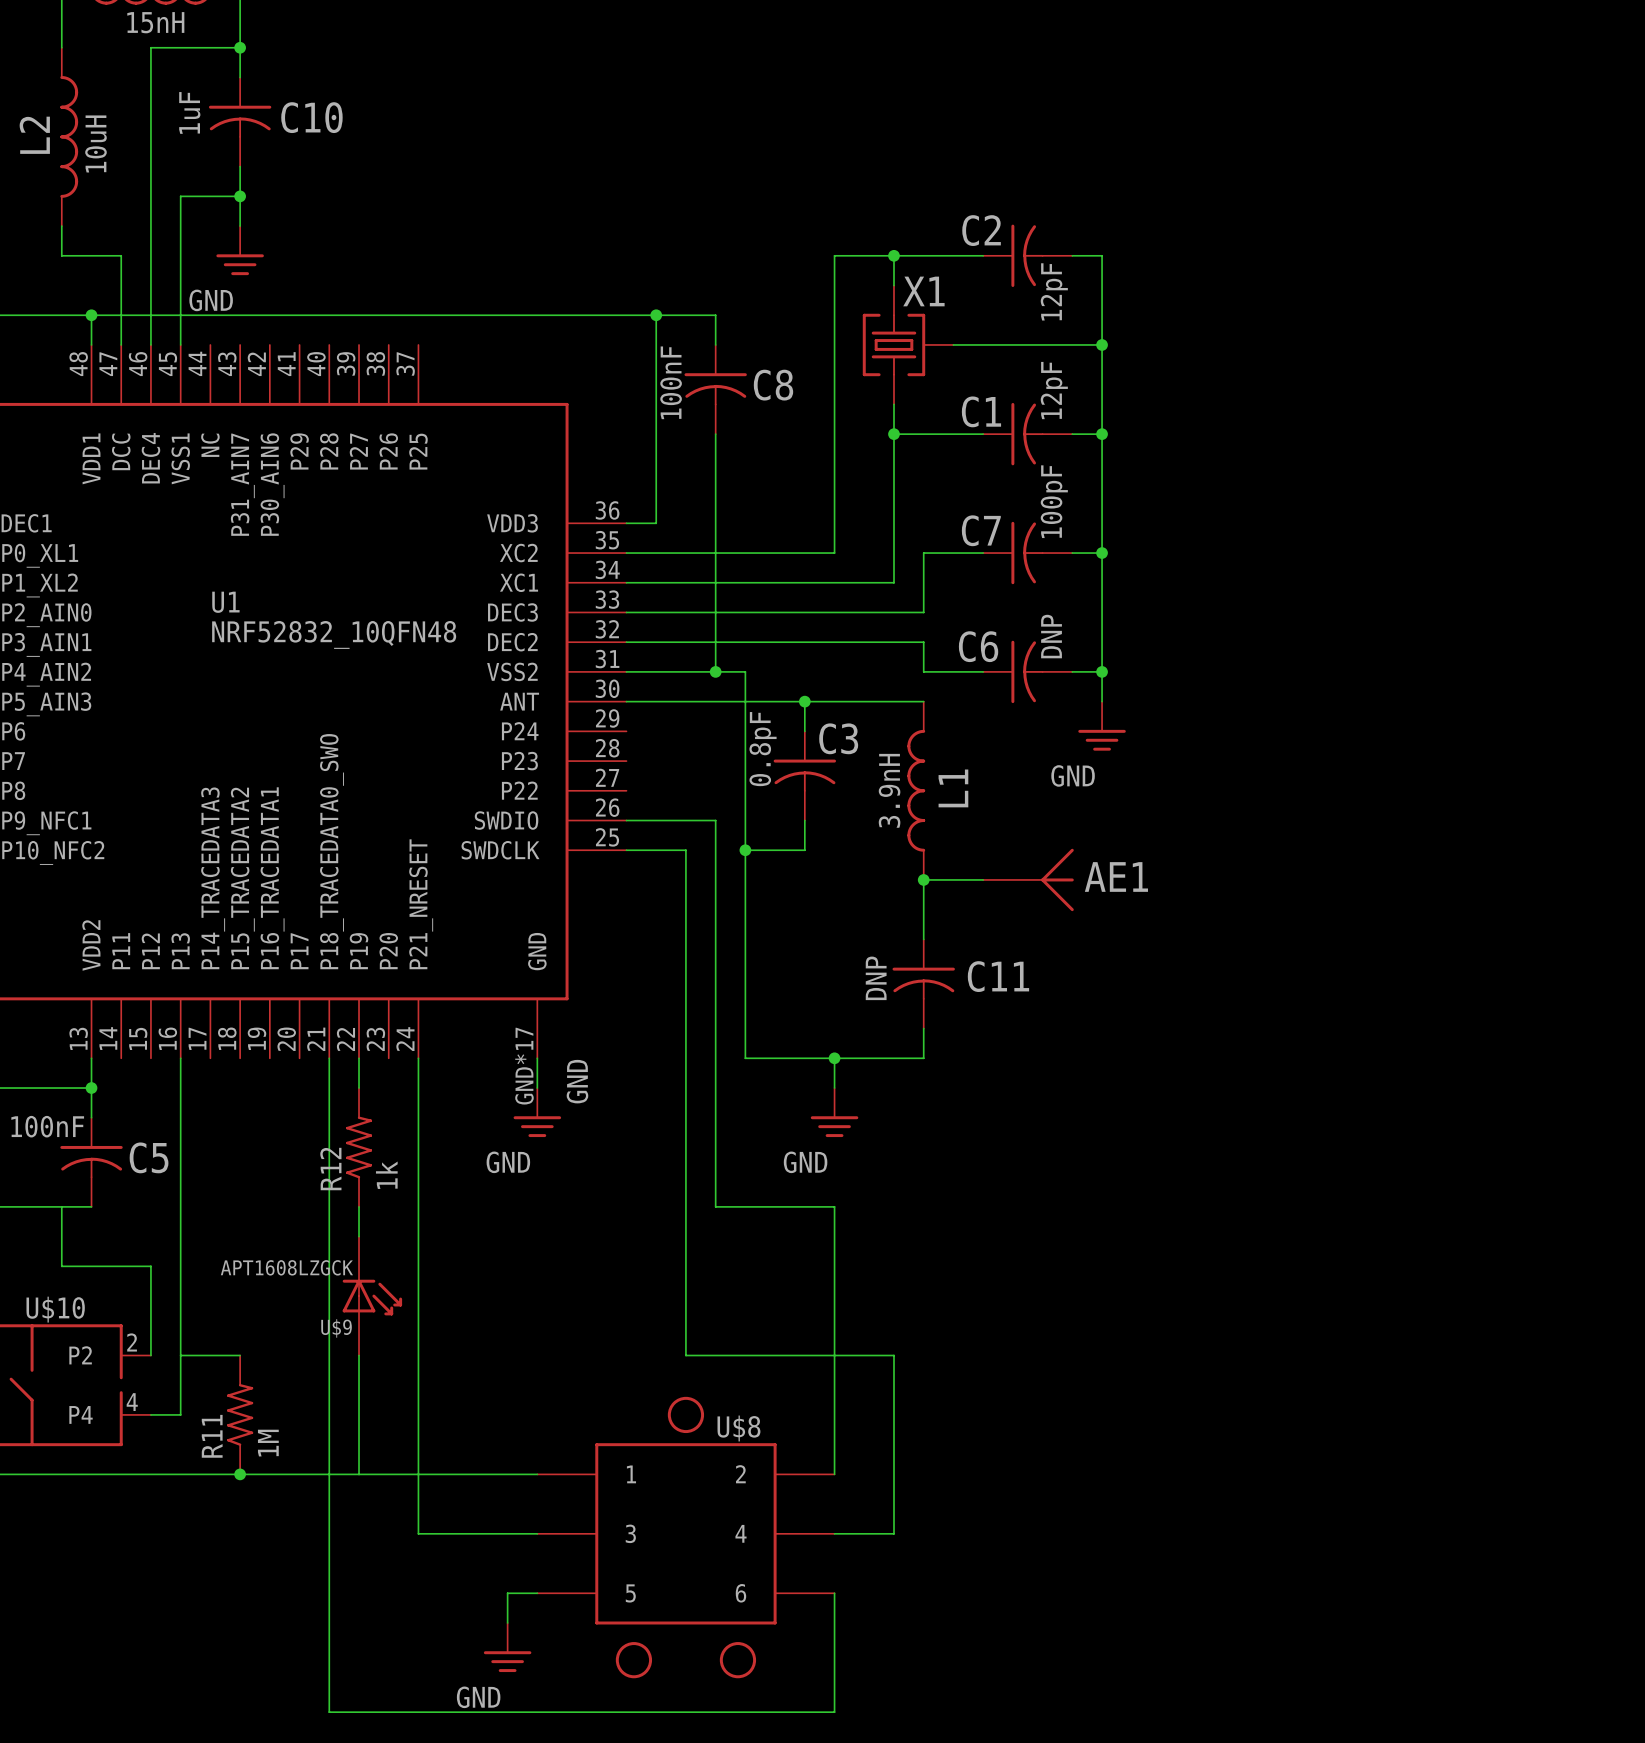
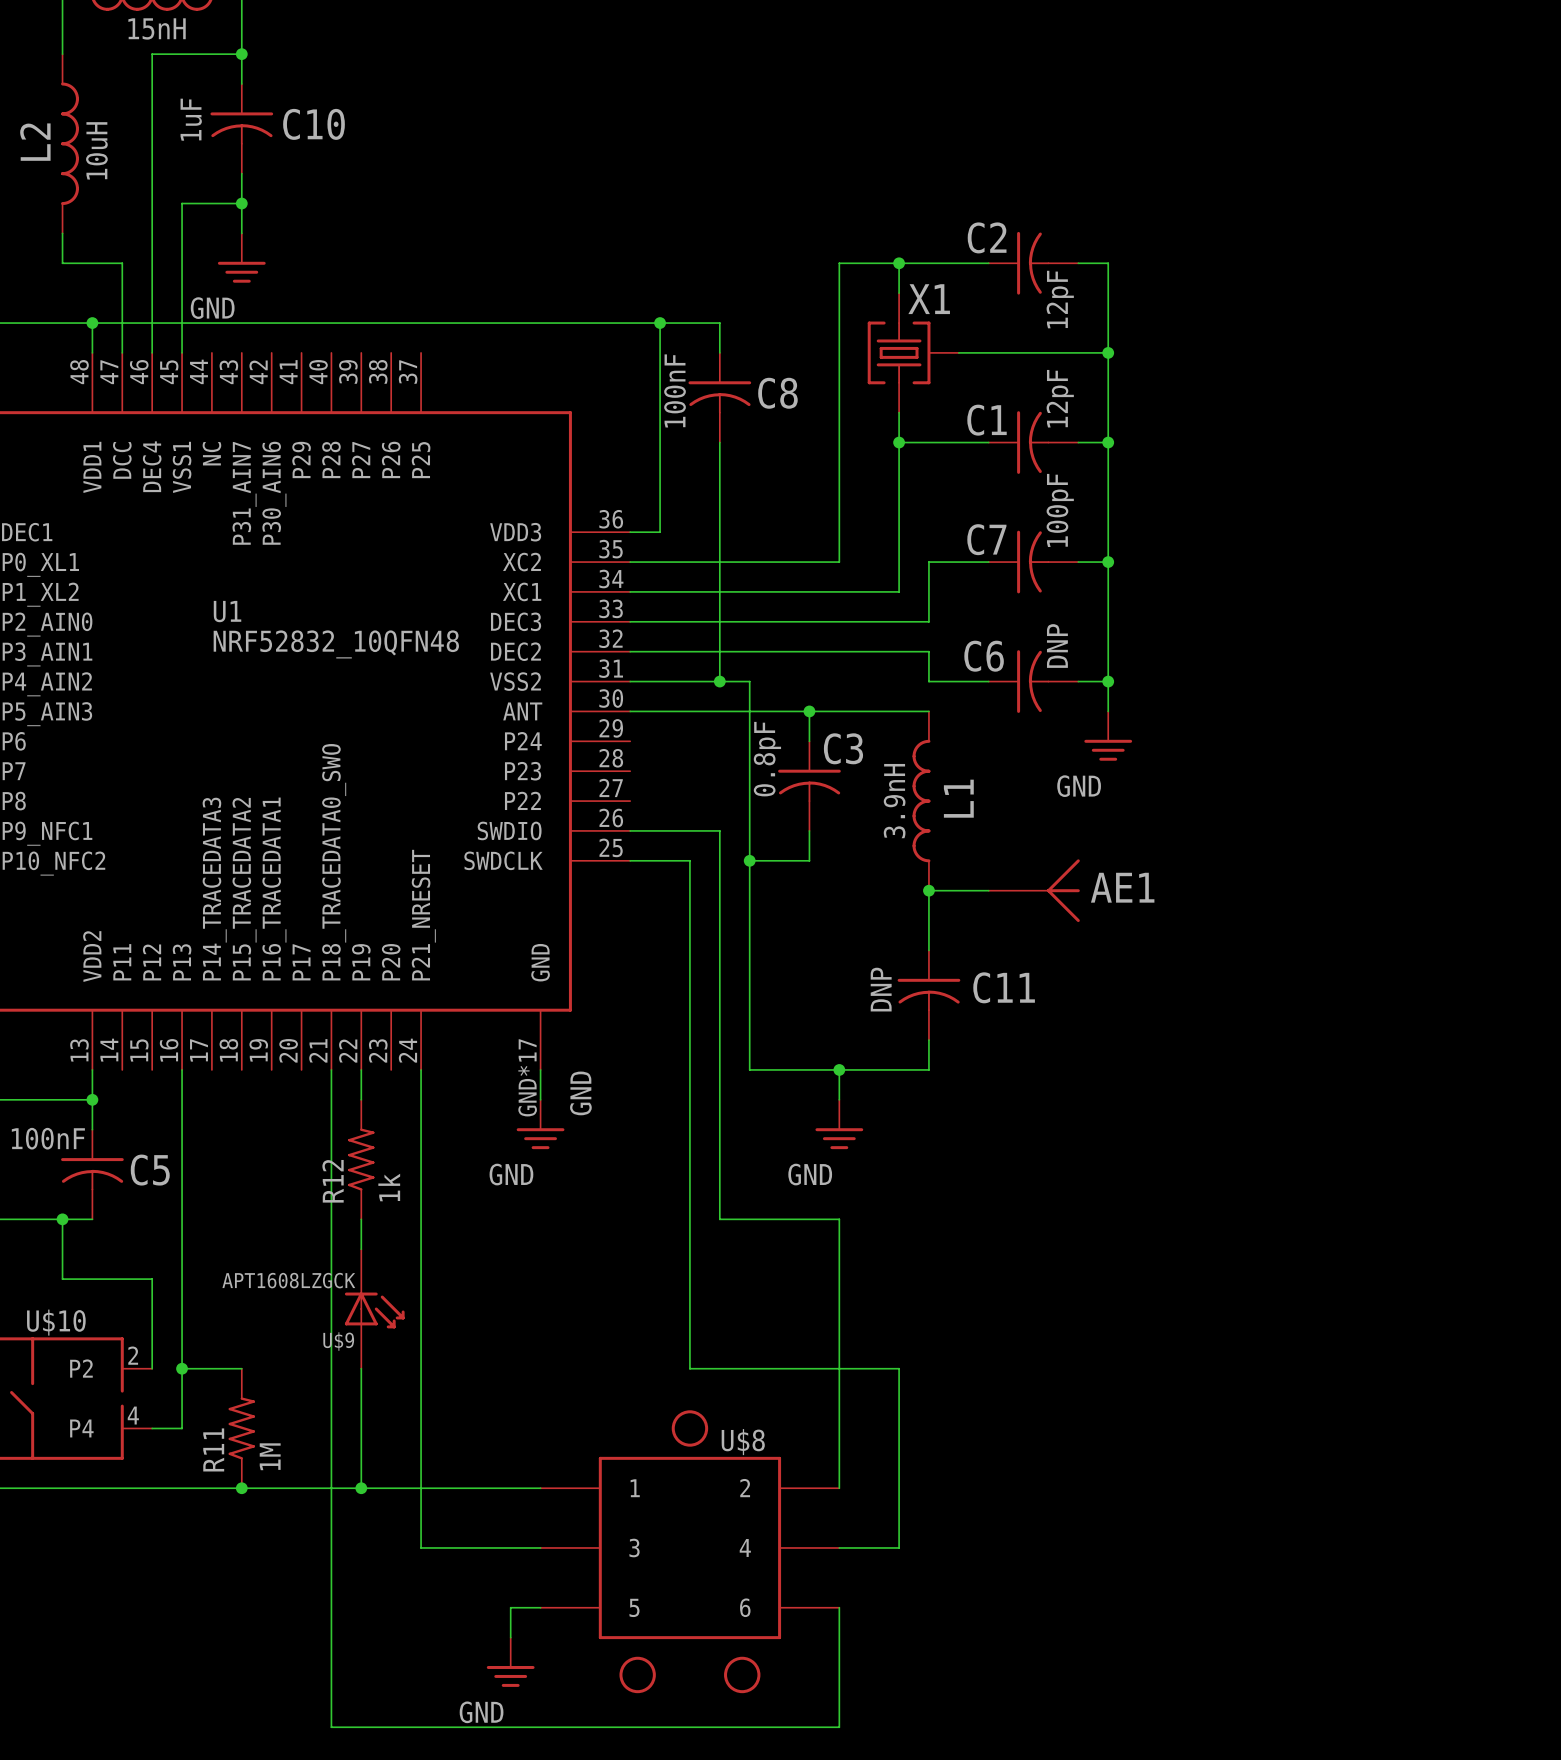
junction: none -> (62, 1219)
junction: none -> (182, 1368)
junction: none -> (361, 1488)

